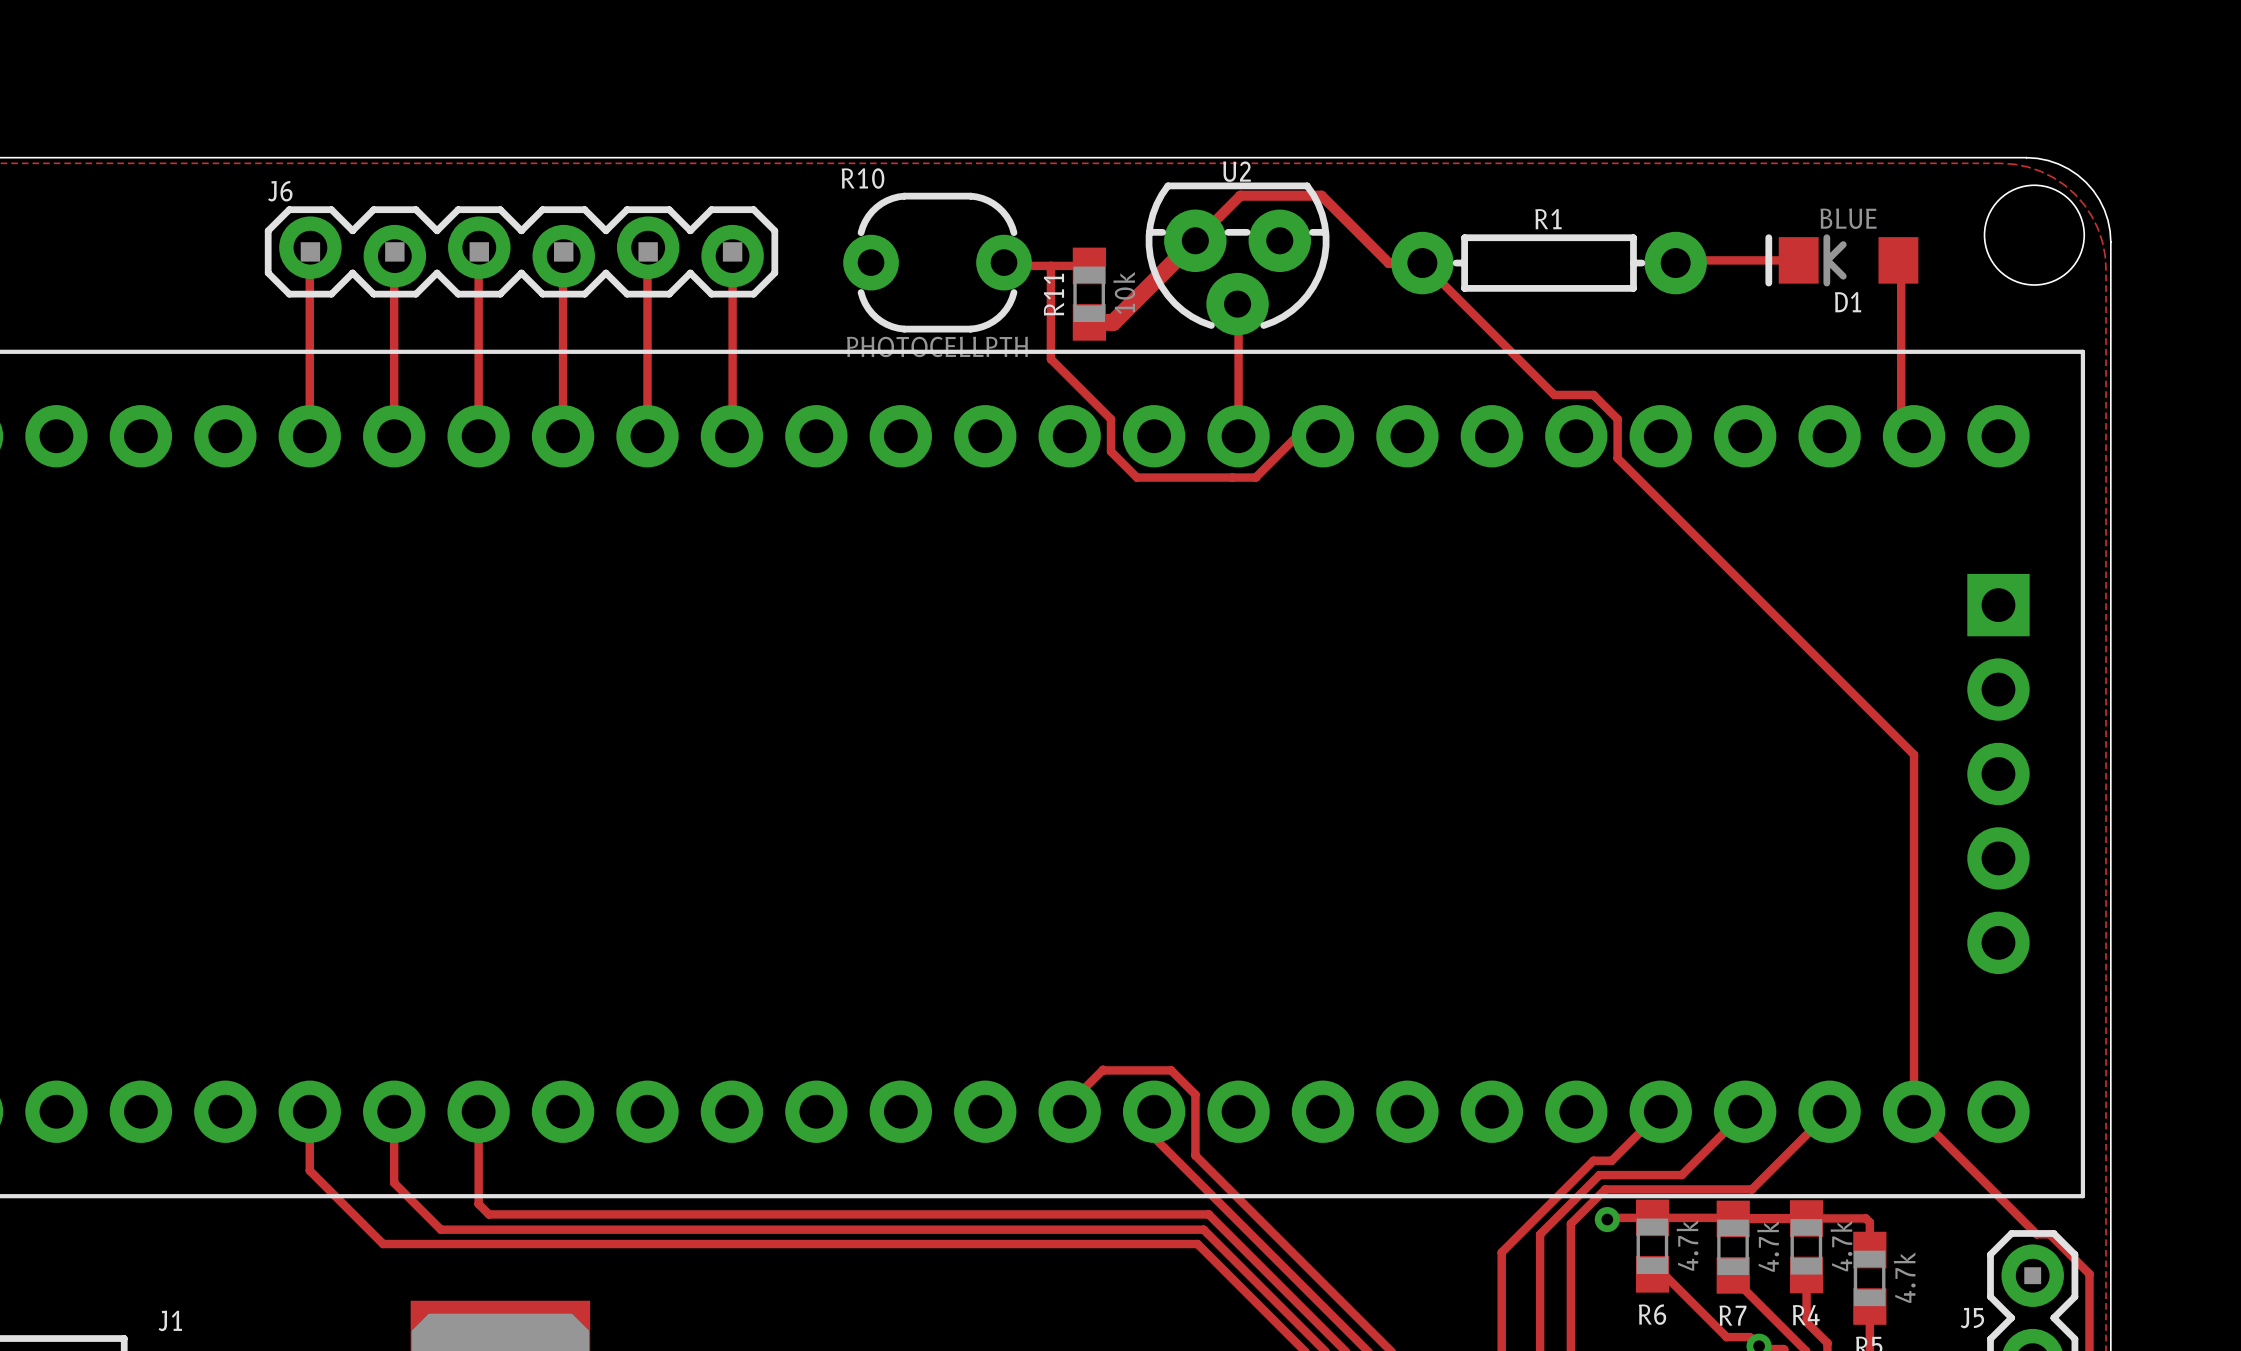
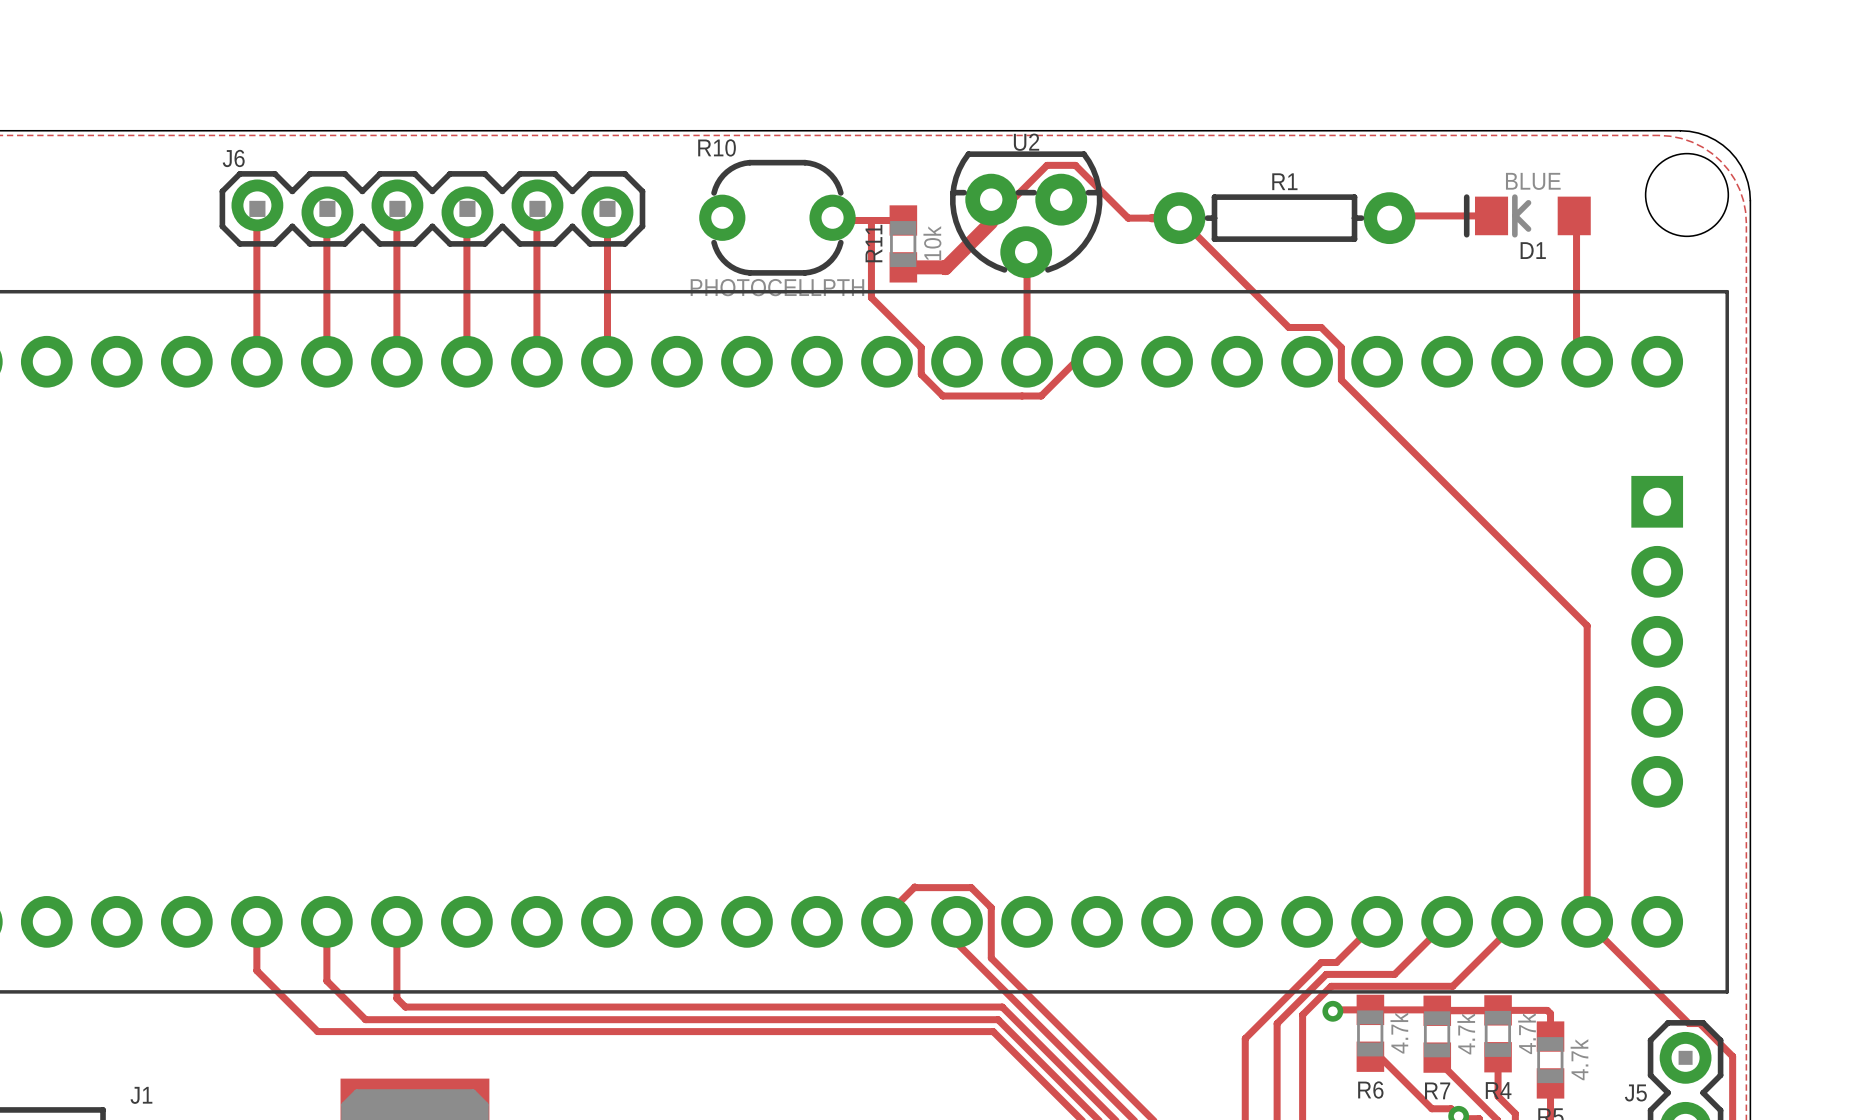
track: (1194, 240) (1113, 322) -> none
track: (1195, 240) (1240, 195) (1321, 195) (1388, 263) -> (923, 267) (945, 268) (991, 222) (991, 199) (1012, 199) (1047, 165) (1075, 165) (1128, 218) (1151, 218)

